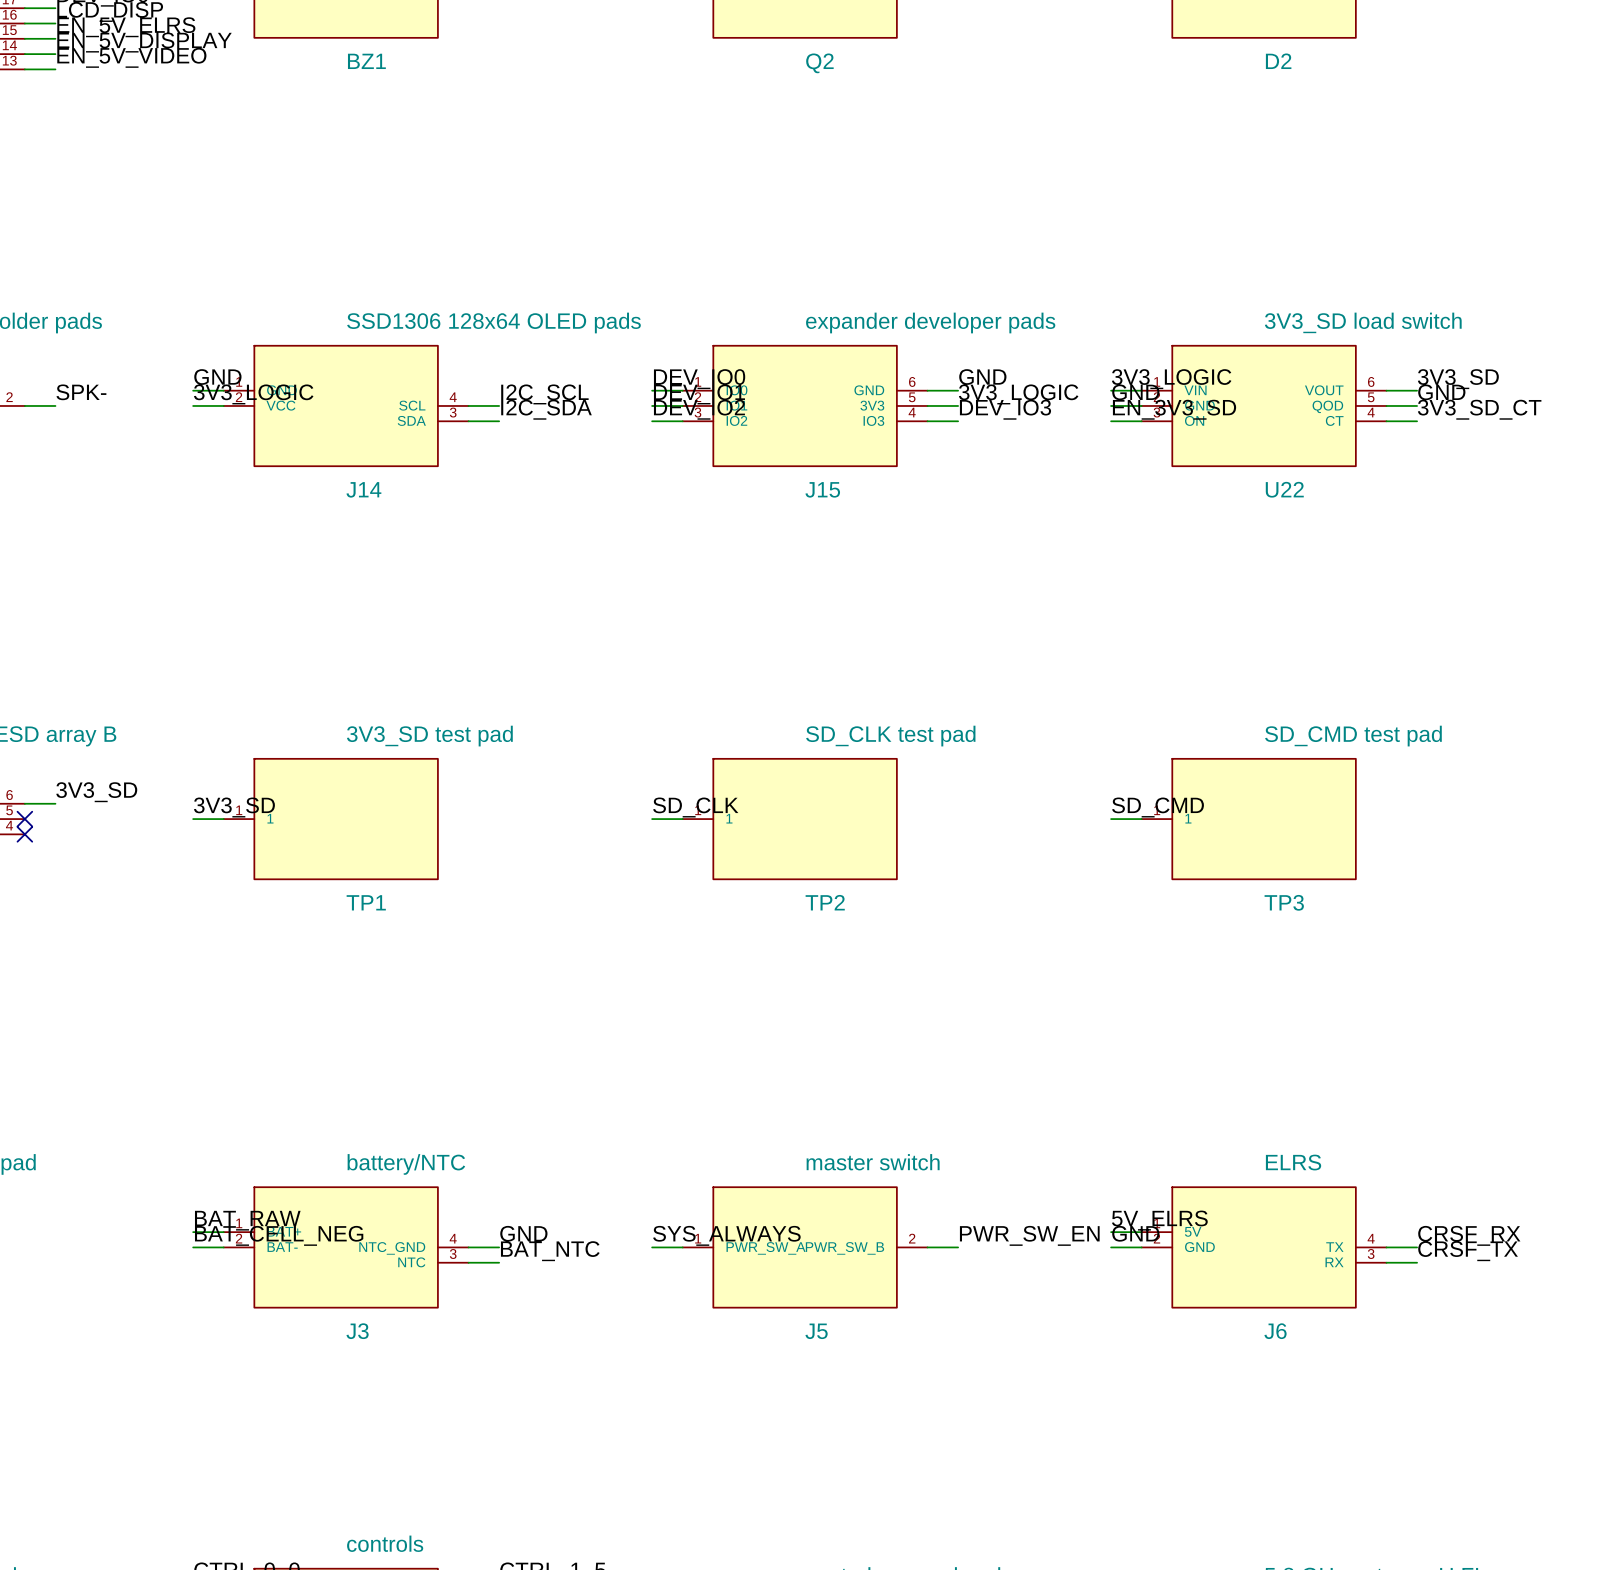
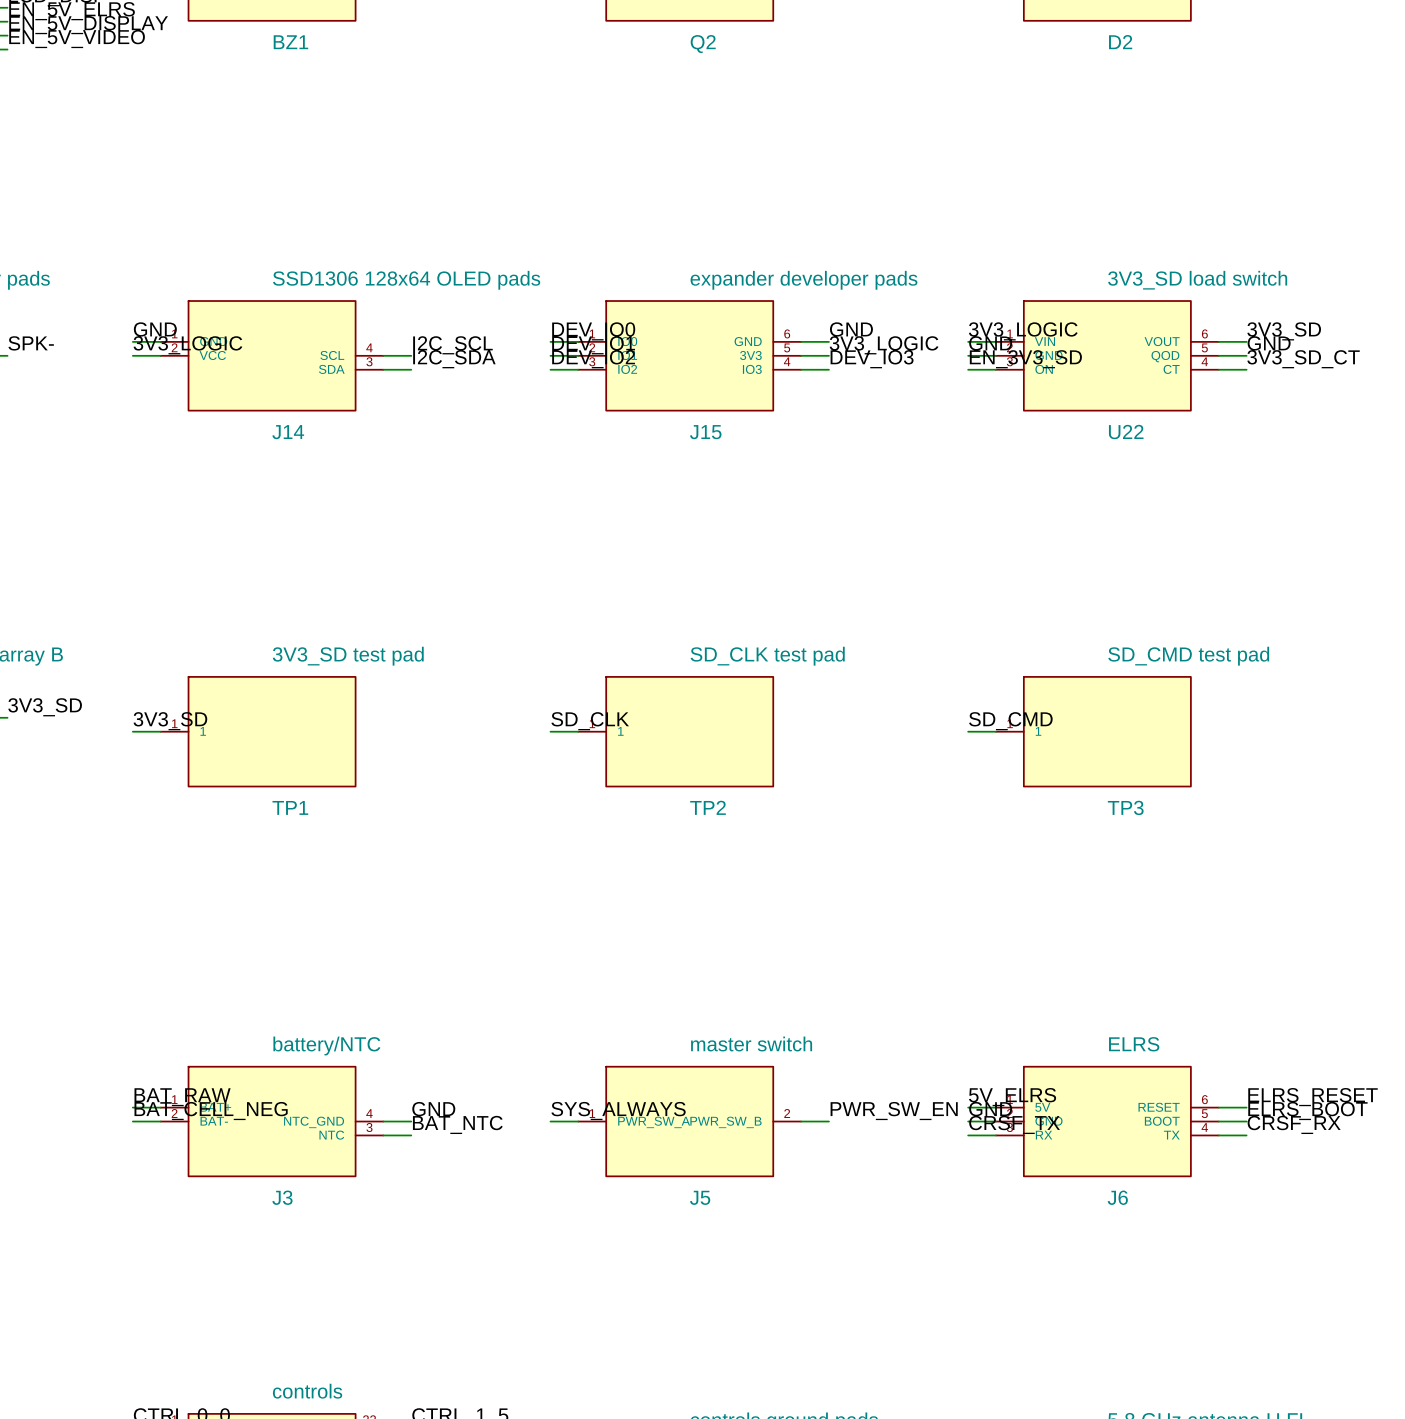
J6 symbol: [1141, 1187, 1387, 1308] -> [996, 1066, 1219, 1177]
label: none -> ELRS_RESET (1312, 1097)
wire: none -> (1218, 1107) (1246, 1107)
label: CRSF_RX (1469, 1235) -> ELRS_BOOT (1307, 1111)
label: none -> CRSF_TX (1014, 1124)
label: CRSF_TX (1468, 1251) -> CRSF_RX (1294, 1124)
wire: none -> (968, 1135) (996, 1135)

